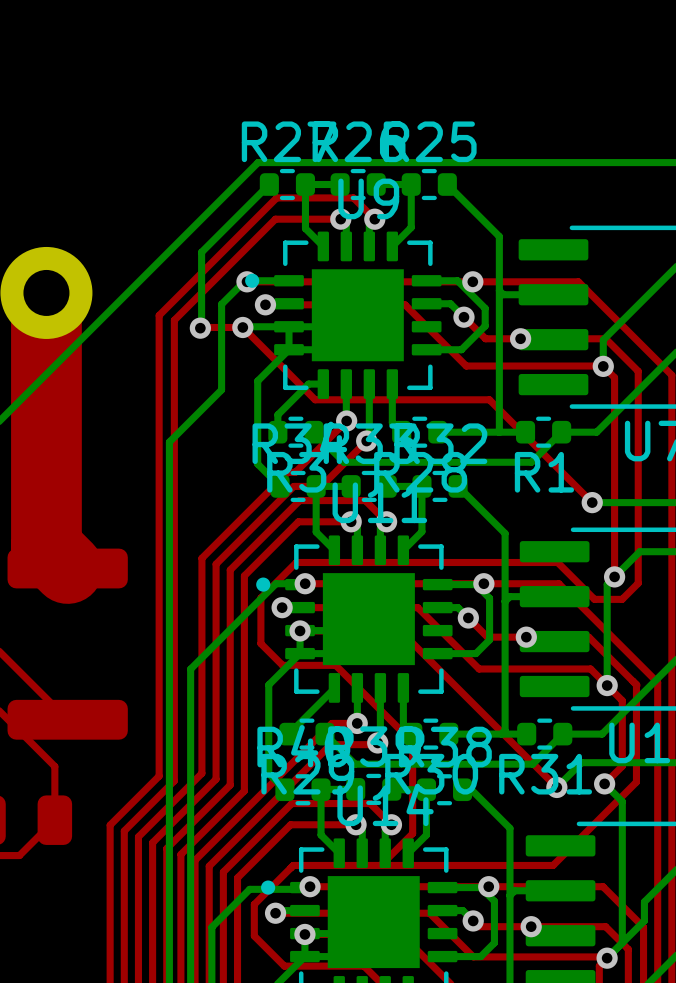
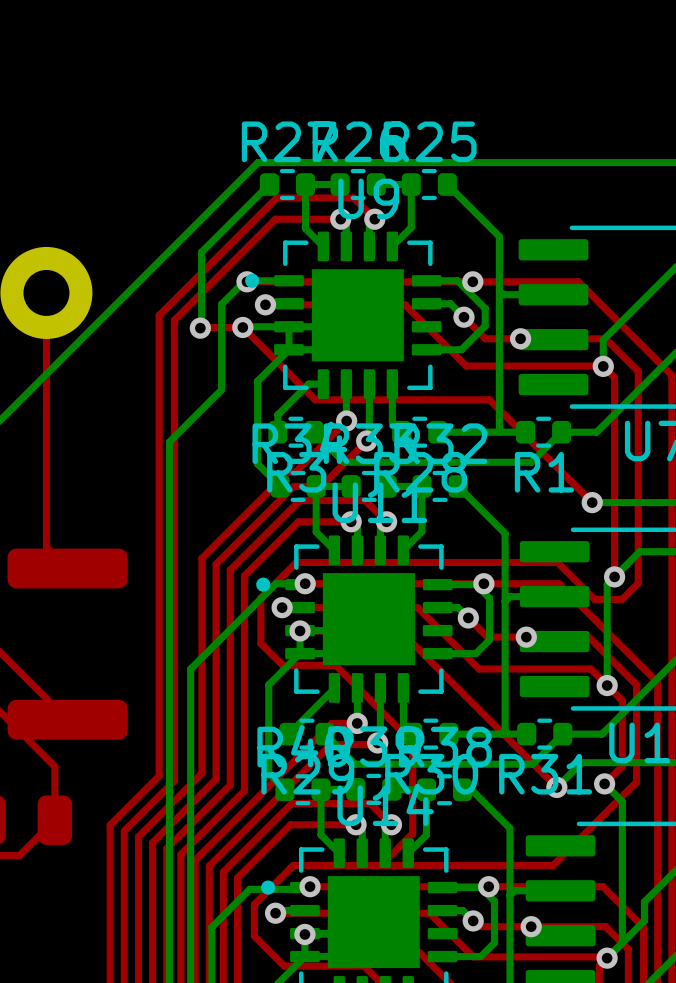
top track width: thick (46, 292) (46, 547) (67, 568) -> thin (46, 292) (46, 547) (67, 568)

